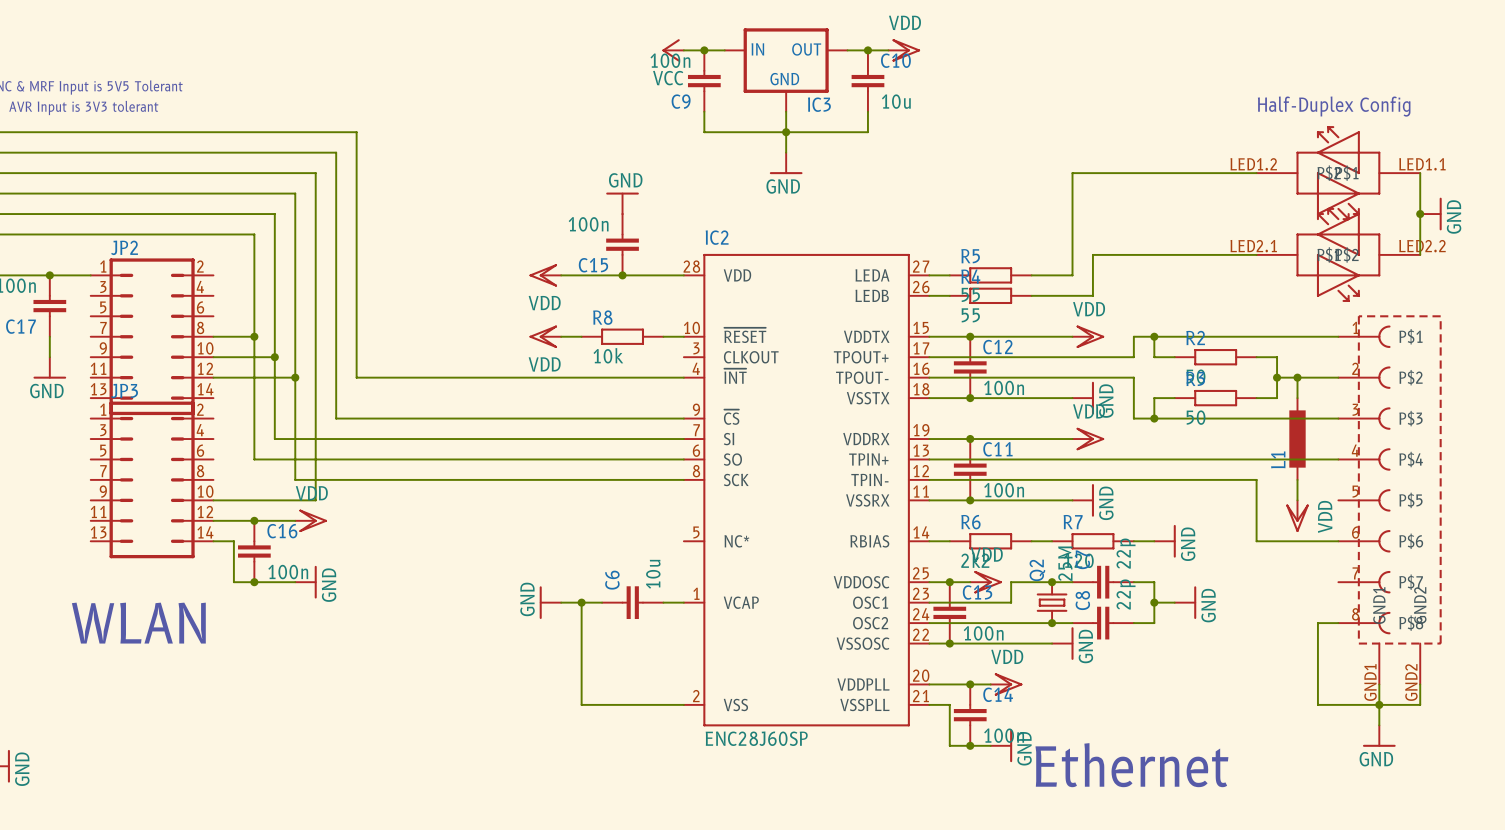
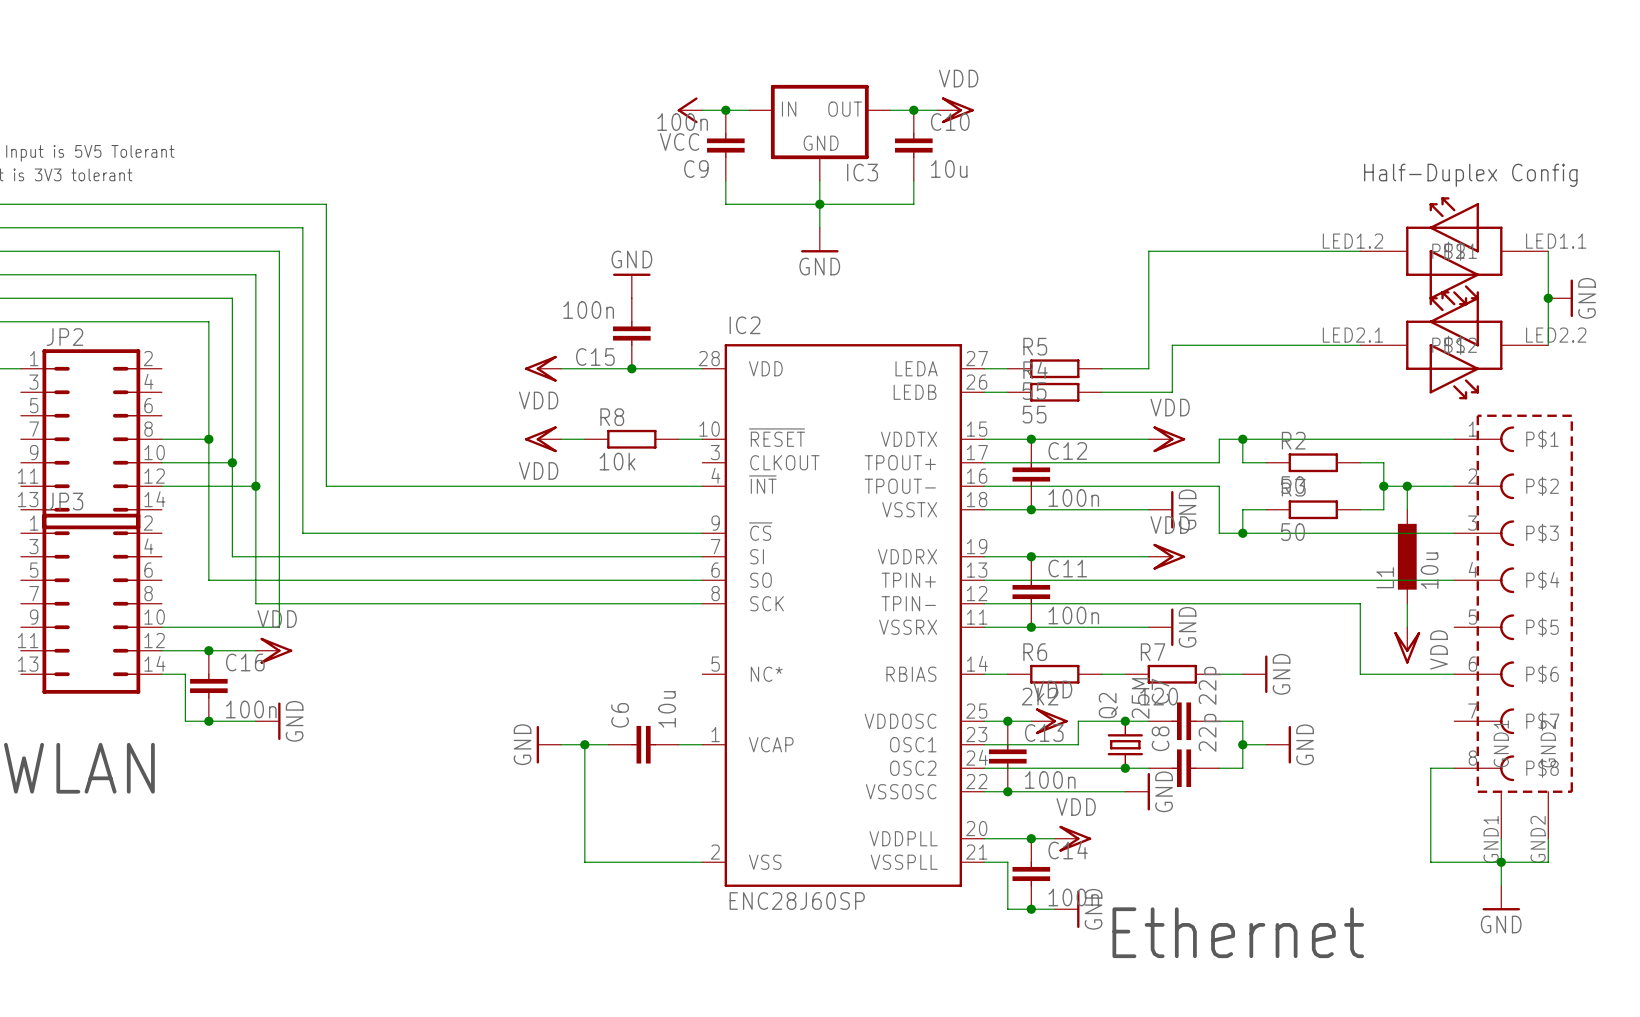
L1 value: none -> 10u (1429, 570)

